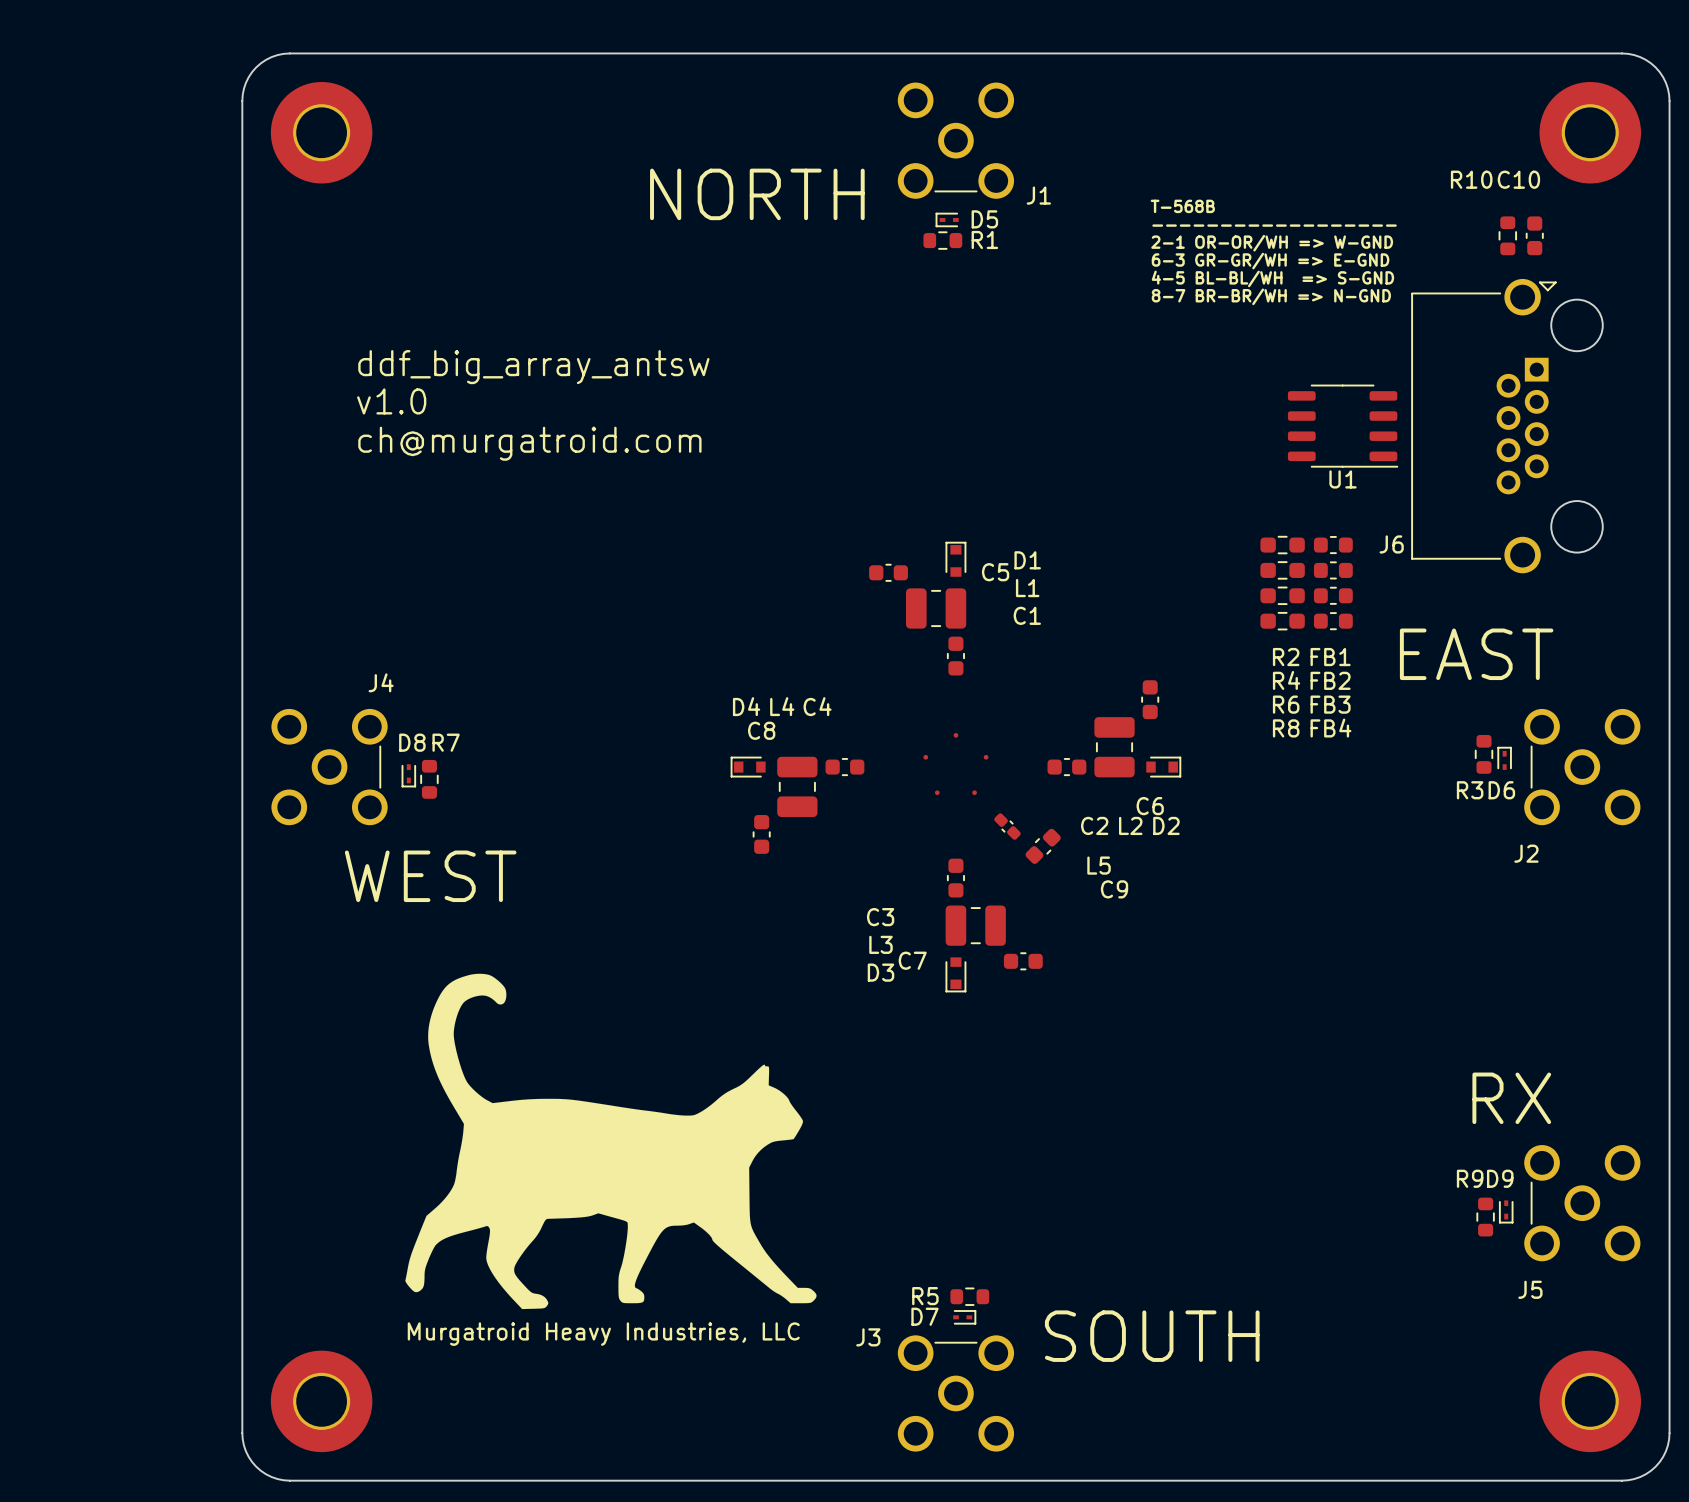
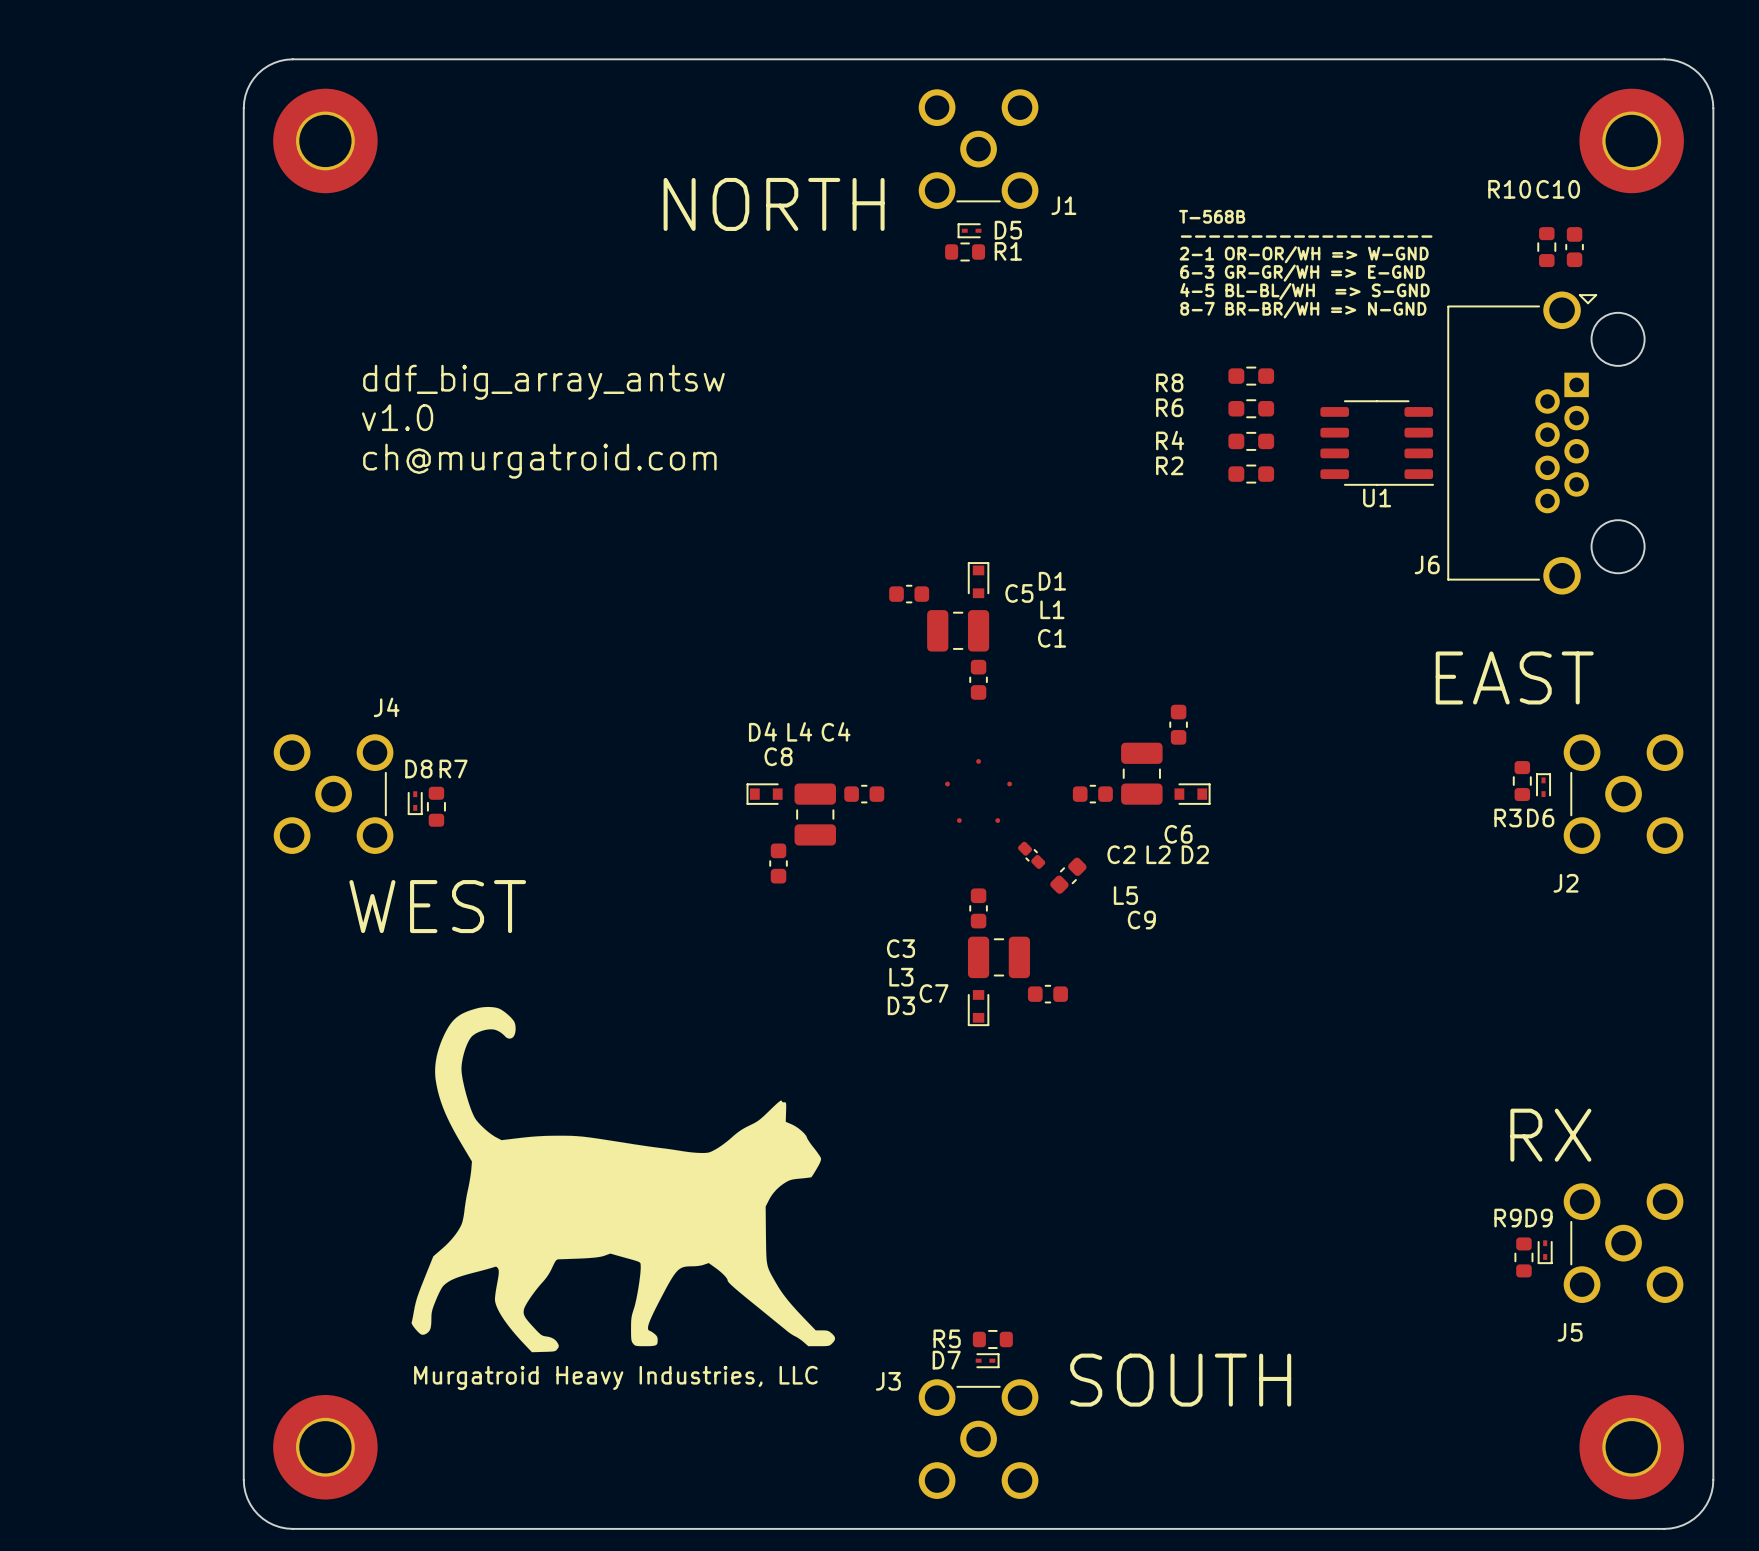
R2 position: (1282, 545) -> (1251, 474)
FB1: (1333, 545) -> none
R4 position: (1282, 570) -> (1251, 441)
FB2: (1333, 570) -> none
R6 position: (1282, 595) -> (1251, 408)
FB3: (1333, 595) -> none
R8 position: (1282, 621) -> (1251, 376)
FB4: (1333, 621) -> none
R2 name position: R2 (1286, 657) -> R2 (1169, 465)
R4 name position: R4 (1286, 680) -> R4 (1170, 440)
R6 name position: R6 (1286, 704) -> R6 (1169, 407)
R8 name position: R8 (1286, 728) -> R8 (1169, 382)

